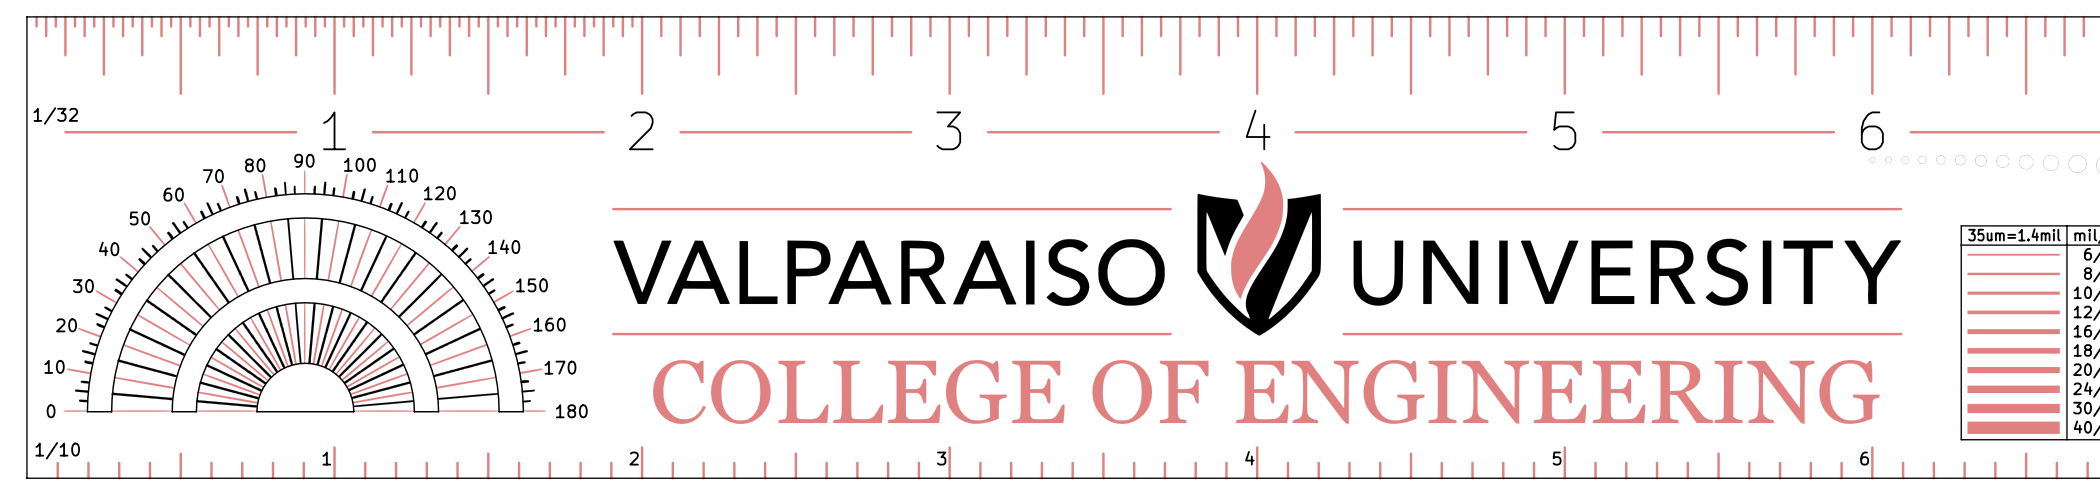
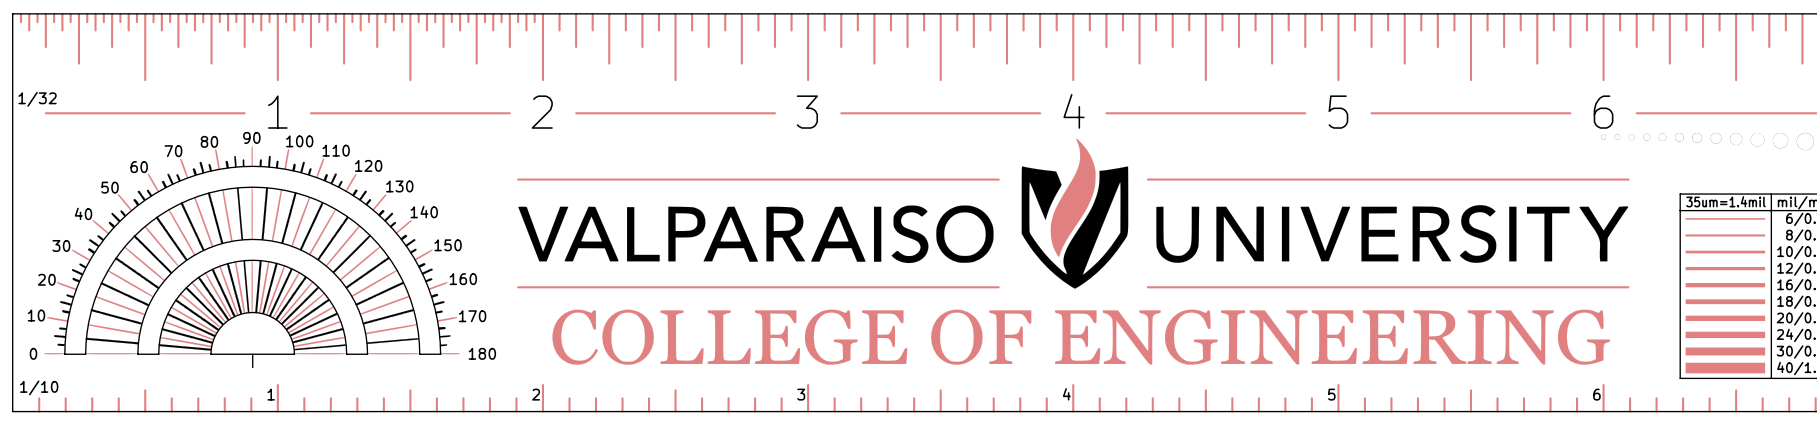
drawing shape: [75, 181, 535, 408] -> [54, 155, 451, 369]

